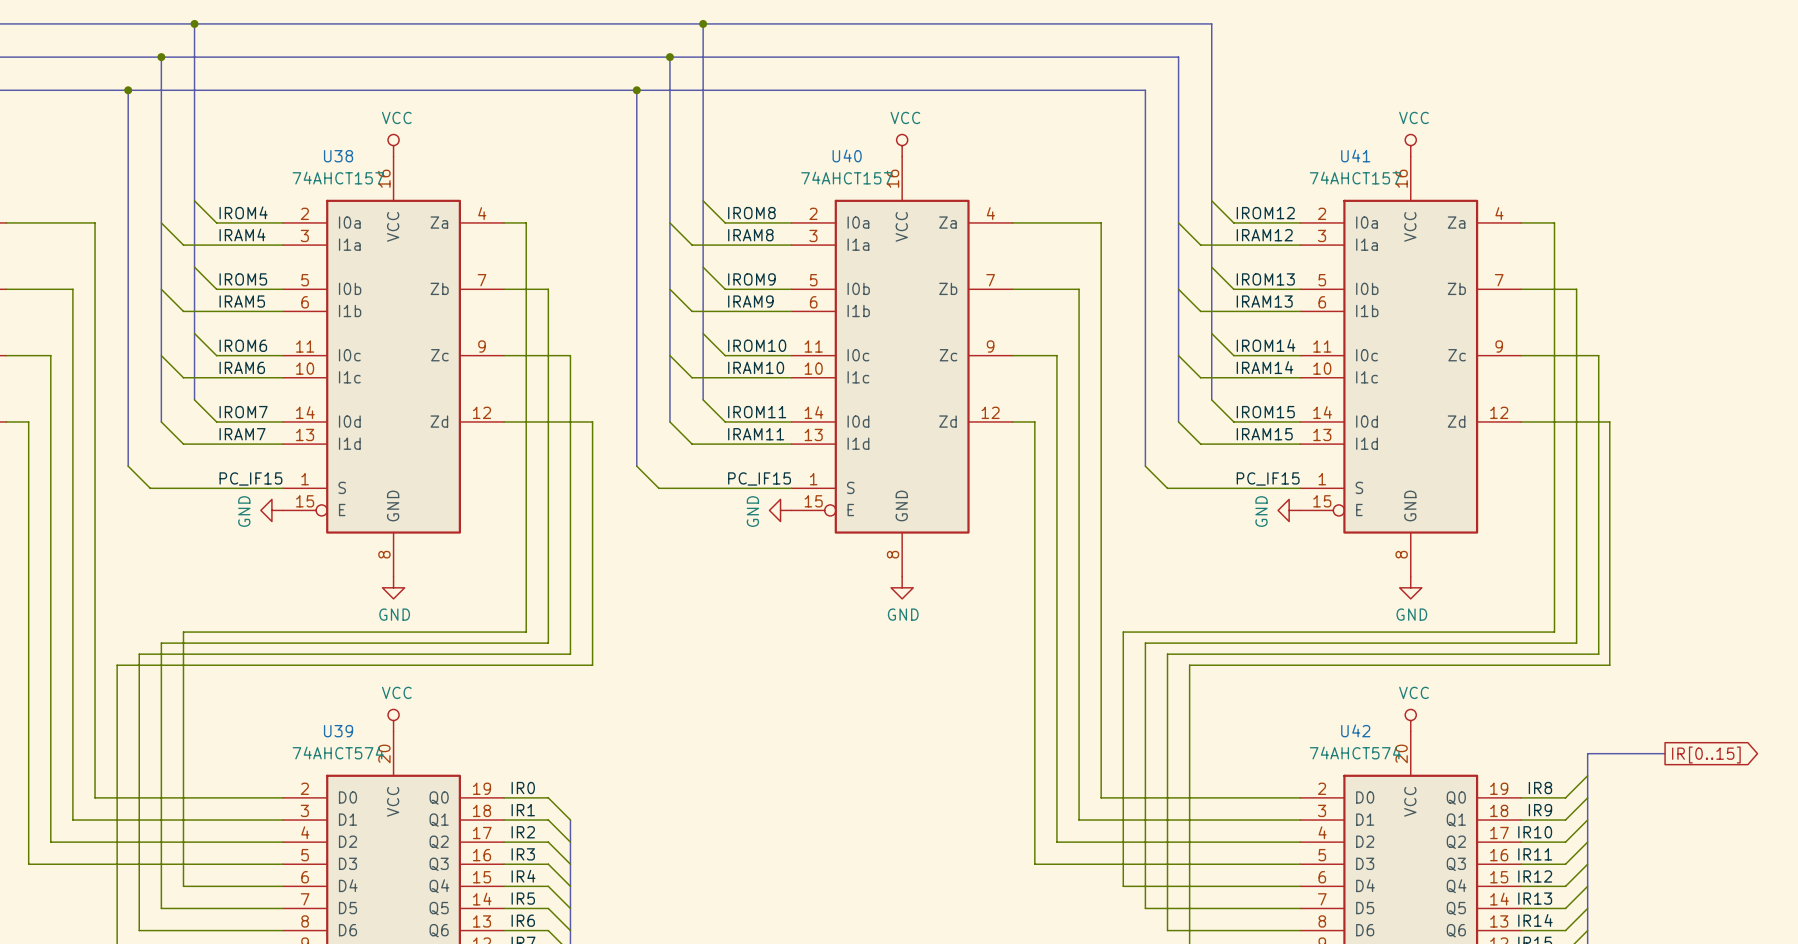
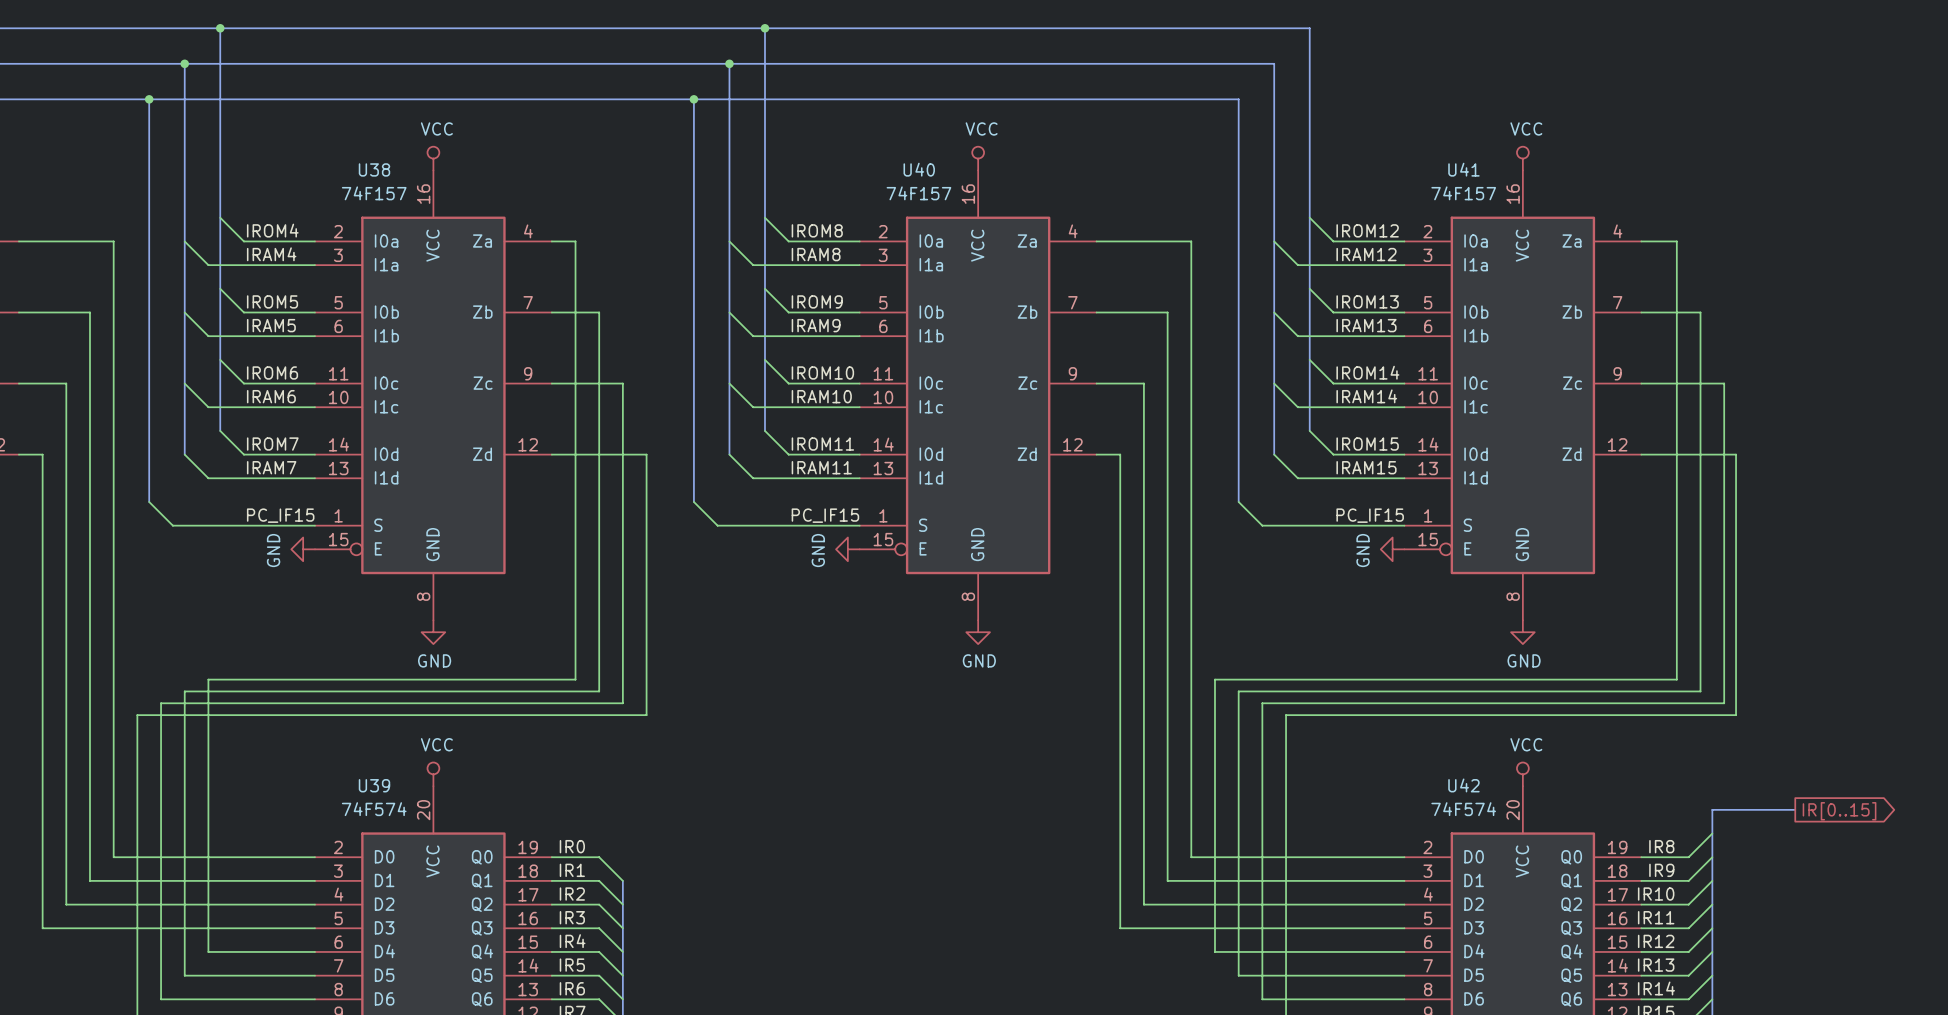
U38 value: 74AHCT157 (338, 178) -> 74F157 (374, 193)
U40 value: 74AHCT157 (846, 178) -> 74F157 (918, 193)
U41 value: 74AHCT157 (1355, 178) -> 74F157 (1463, 193)
U39 value: 74AHCT574 (338, 753) -> 74F574 (374, 809)
U42 value: 74AHCT574 (1355, 753) -> 74F574 (1463, 809)

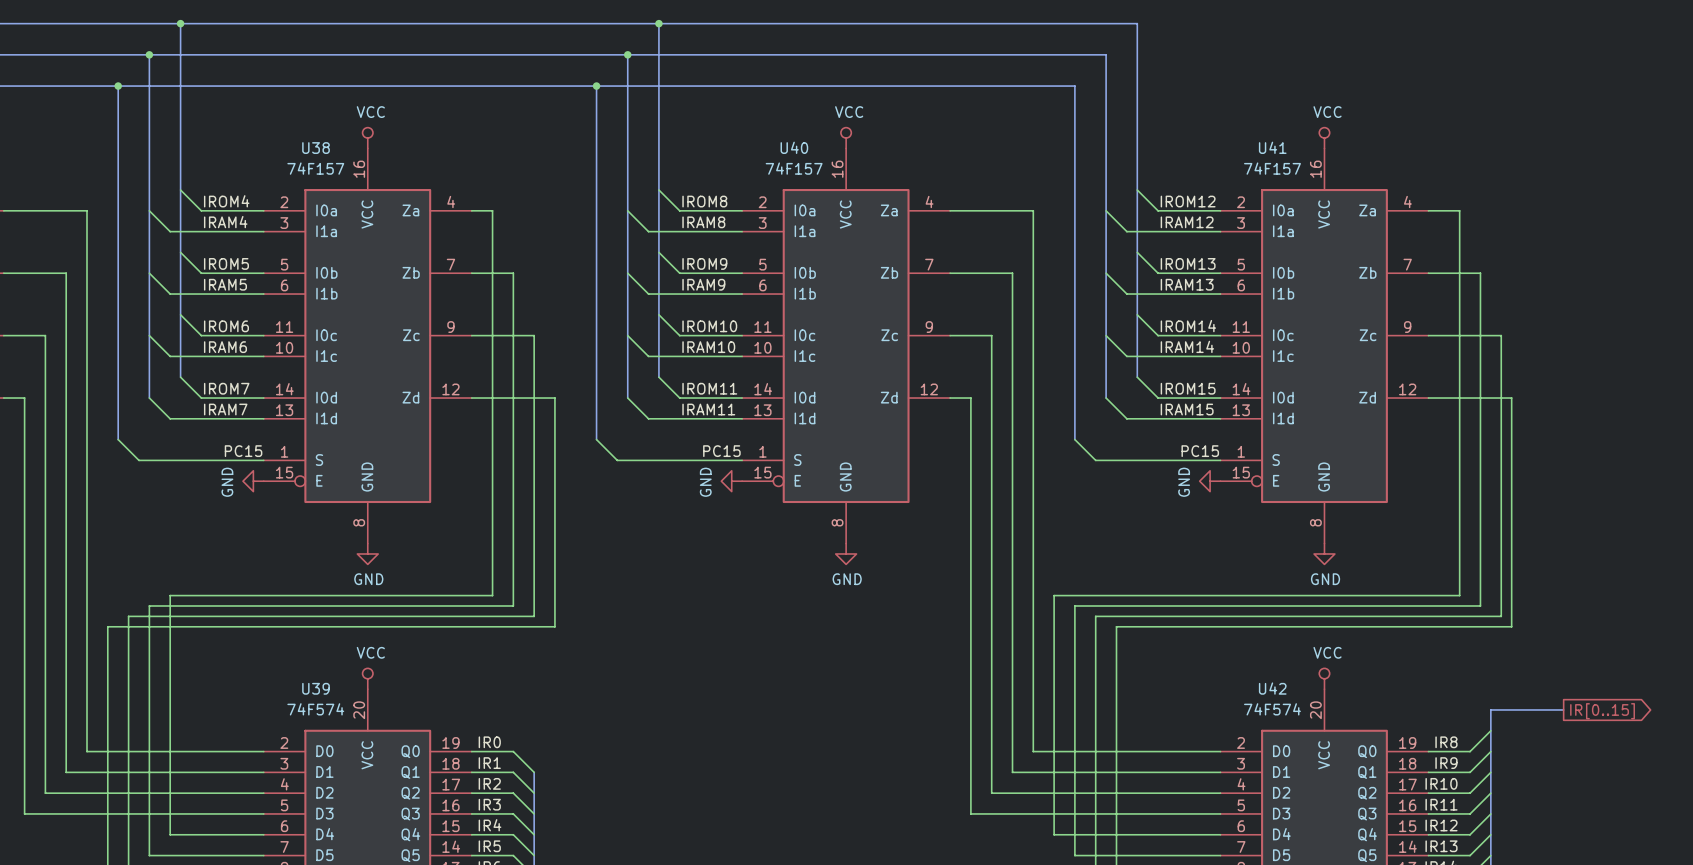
label: PC_IF15 (280, 515) -> PC15 (243, 451)
label: PC_IF15 (825, 515) -> PC15 (721, 451)
label: PC_IF15 (1370, 515) -> PC15 (1200, 451)

